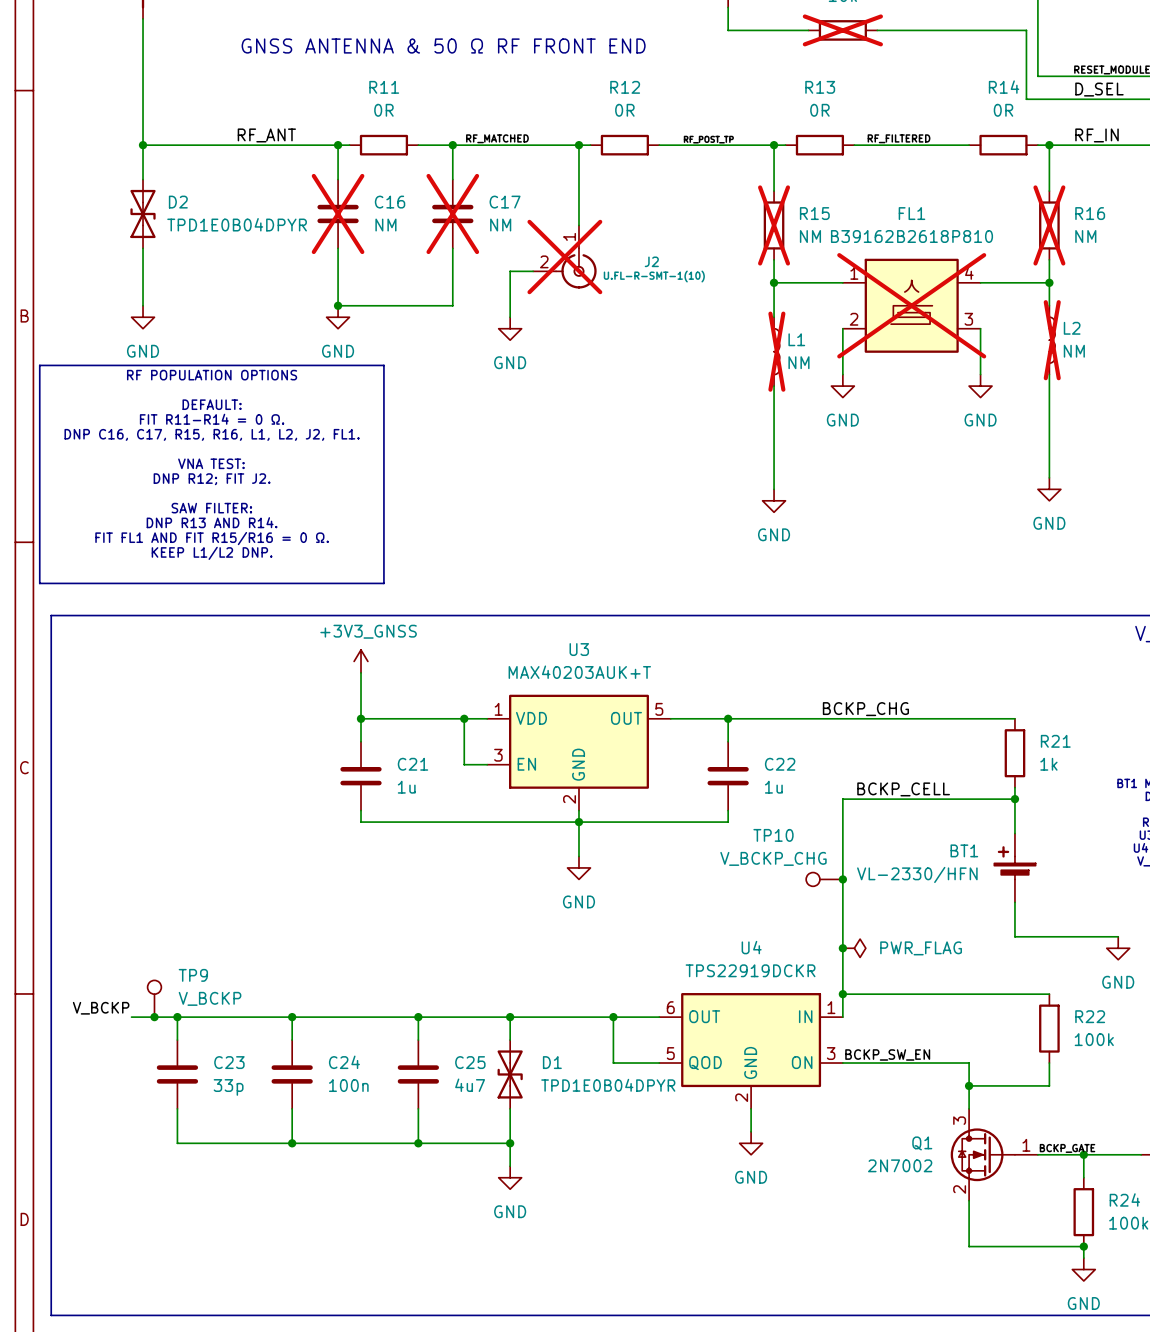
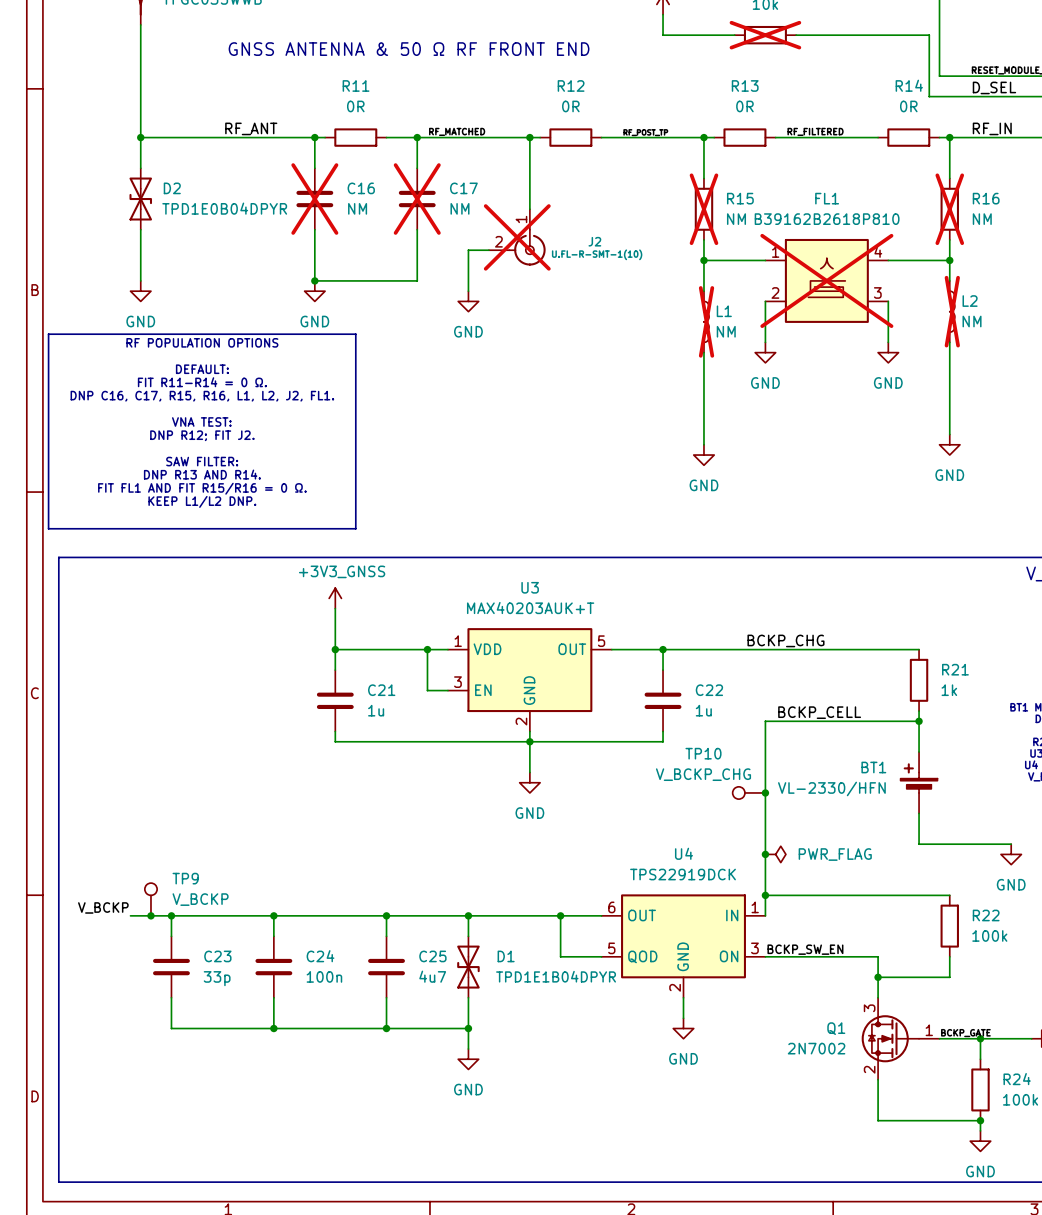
U4 value: TPS22919DCKR (750, 970) -> TPS22919DCK (683, 874)
D1 value: TPD1E0B04DPYR (608, 1085) -> TPD1E1B04DPYR (556, 976)

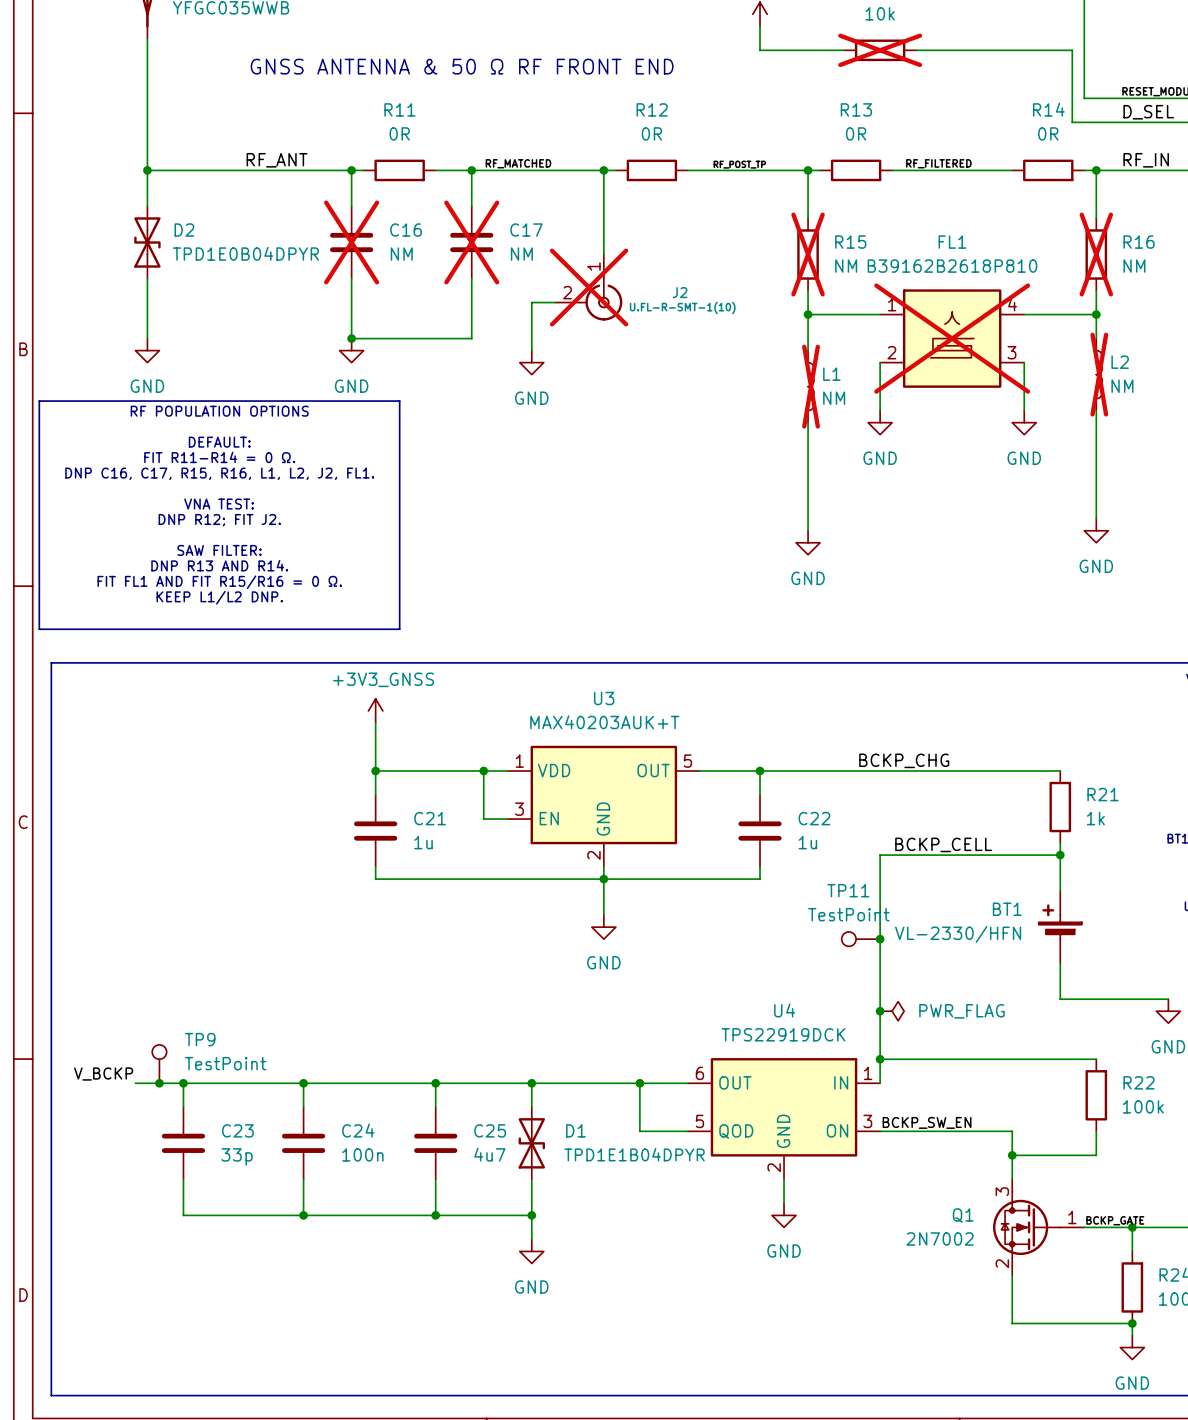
TP10 name: TP10 (703, 753) -> TP11 (848, 890)
TP10 value: V_BCKP_CHG (703, 774) -> TestPoint (848, 914)
TP9 value: V_BCKP (200, 899) -> TestPoint (225, 1063)

